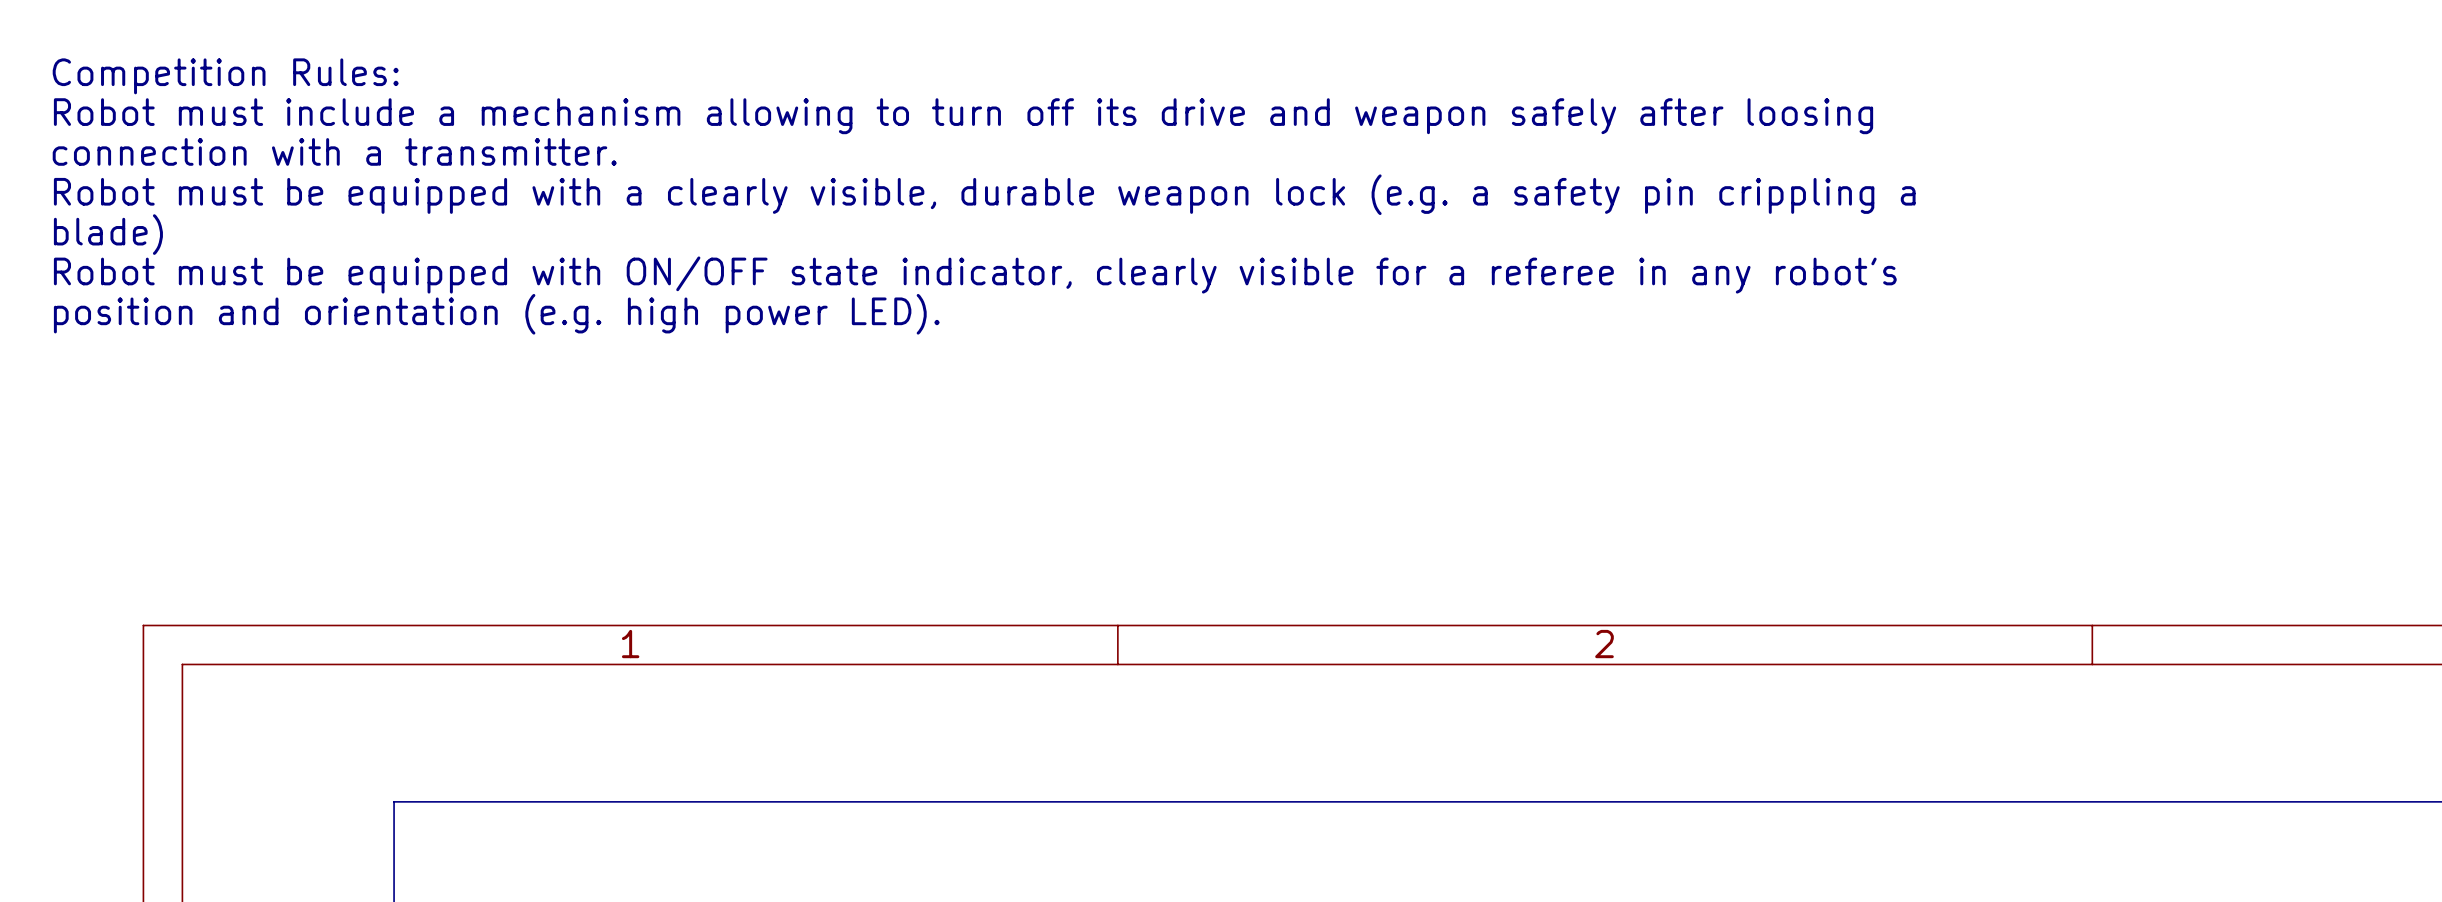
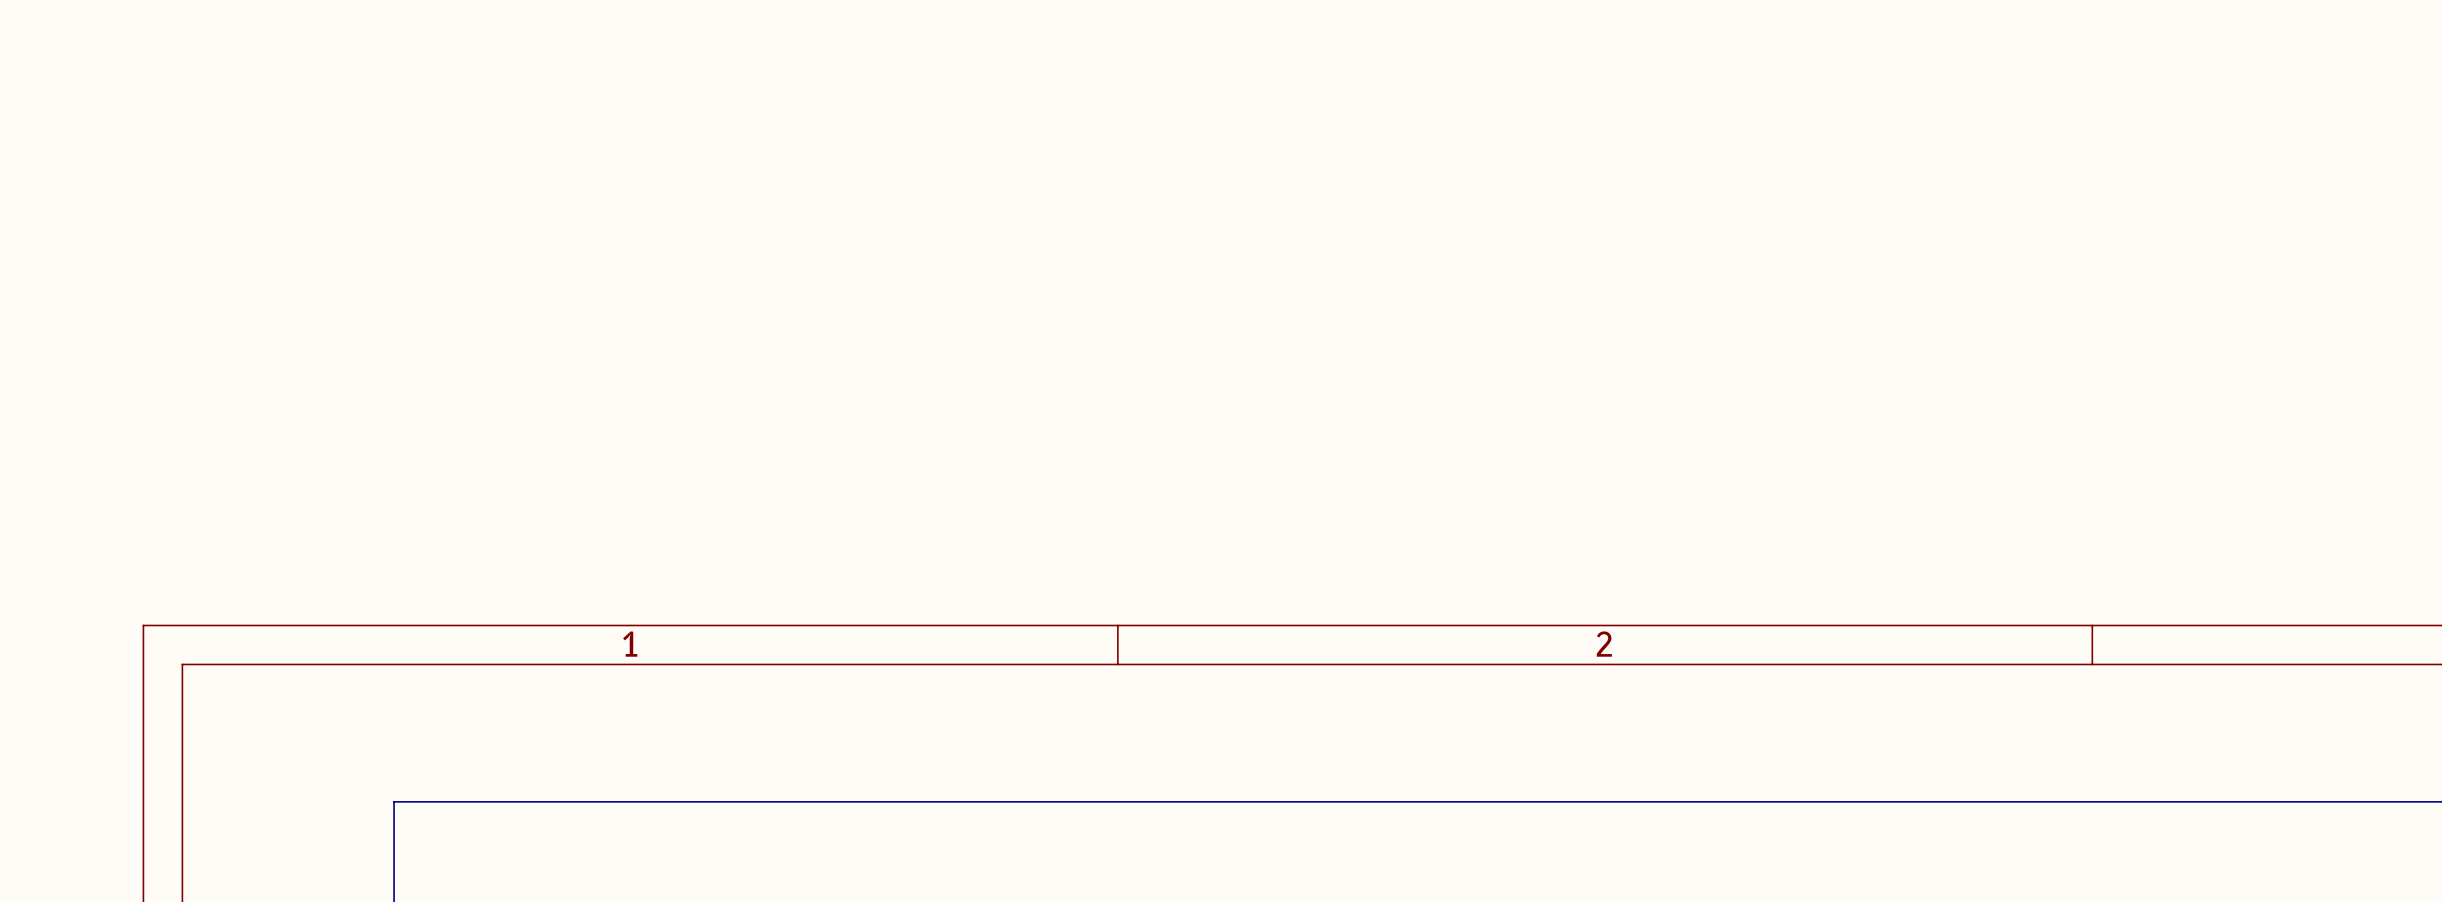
text: Competition Rules: (225, 76) -> none
text: Robot must include a mechanism allowing to turn off its drive and weapon safely after loosing (963, 116) -> none
text: connection with a transmitter. (334, 151) -> none
text: Robot must be equipped with a clearly visible, durable weapon lock (e.g. a safety pin crippling a (984, 194) -> none
text: blade) (108, 234) -> none
text: Robot must be equipped with ON/OFF state indicator, clearly visible for a referee in any robot's (975, 275) -> none
text: position and orientation (e.g. high power LED). (496, 314) -> none

